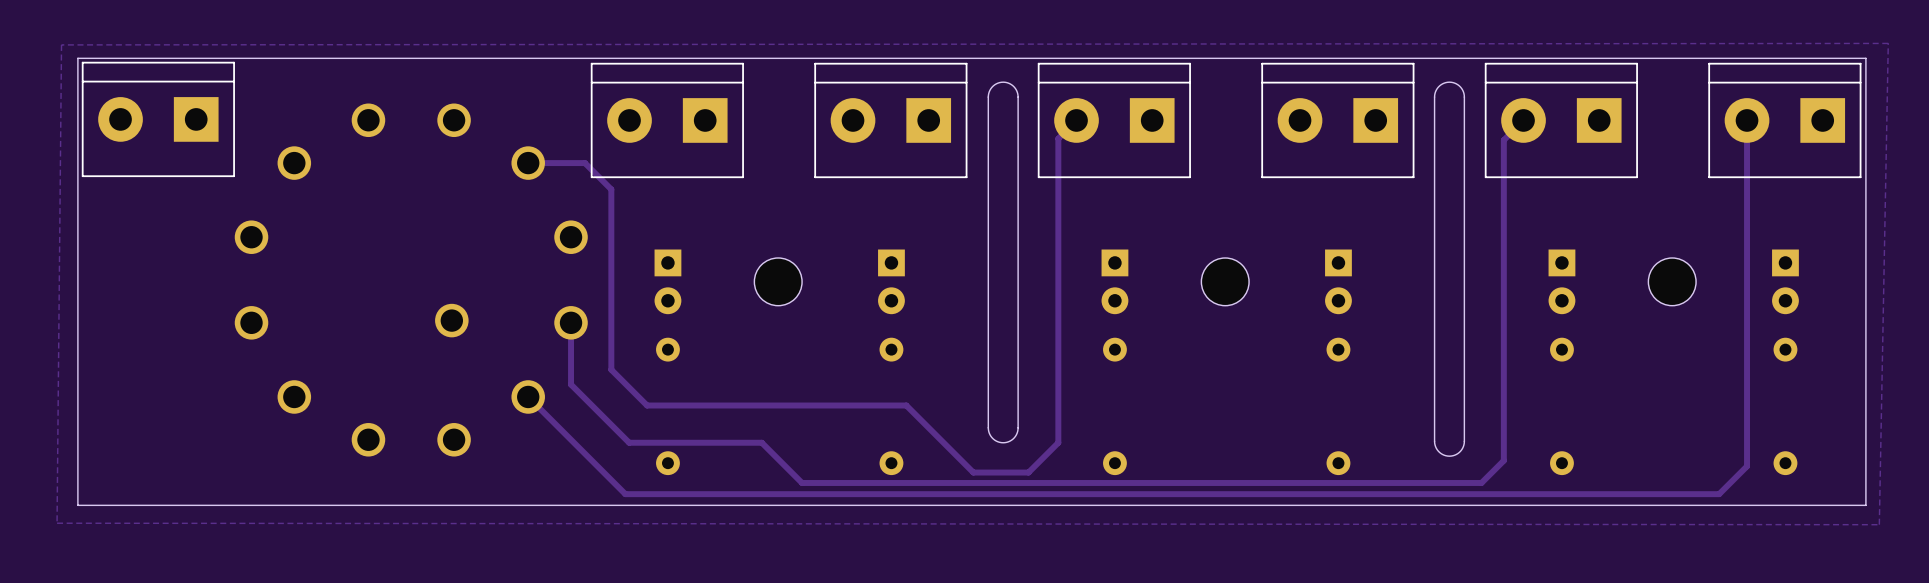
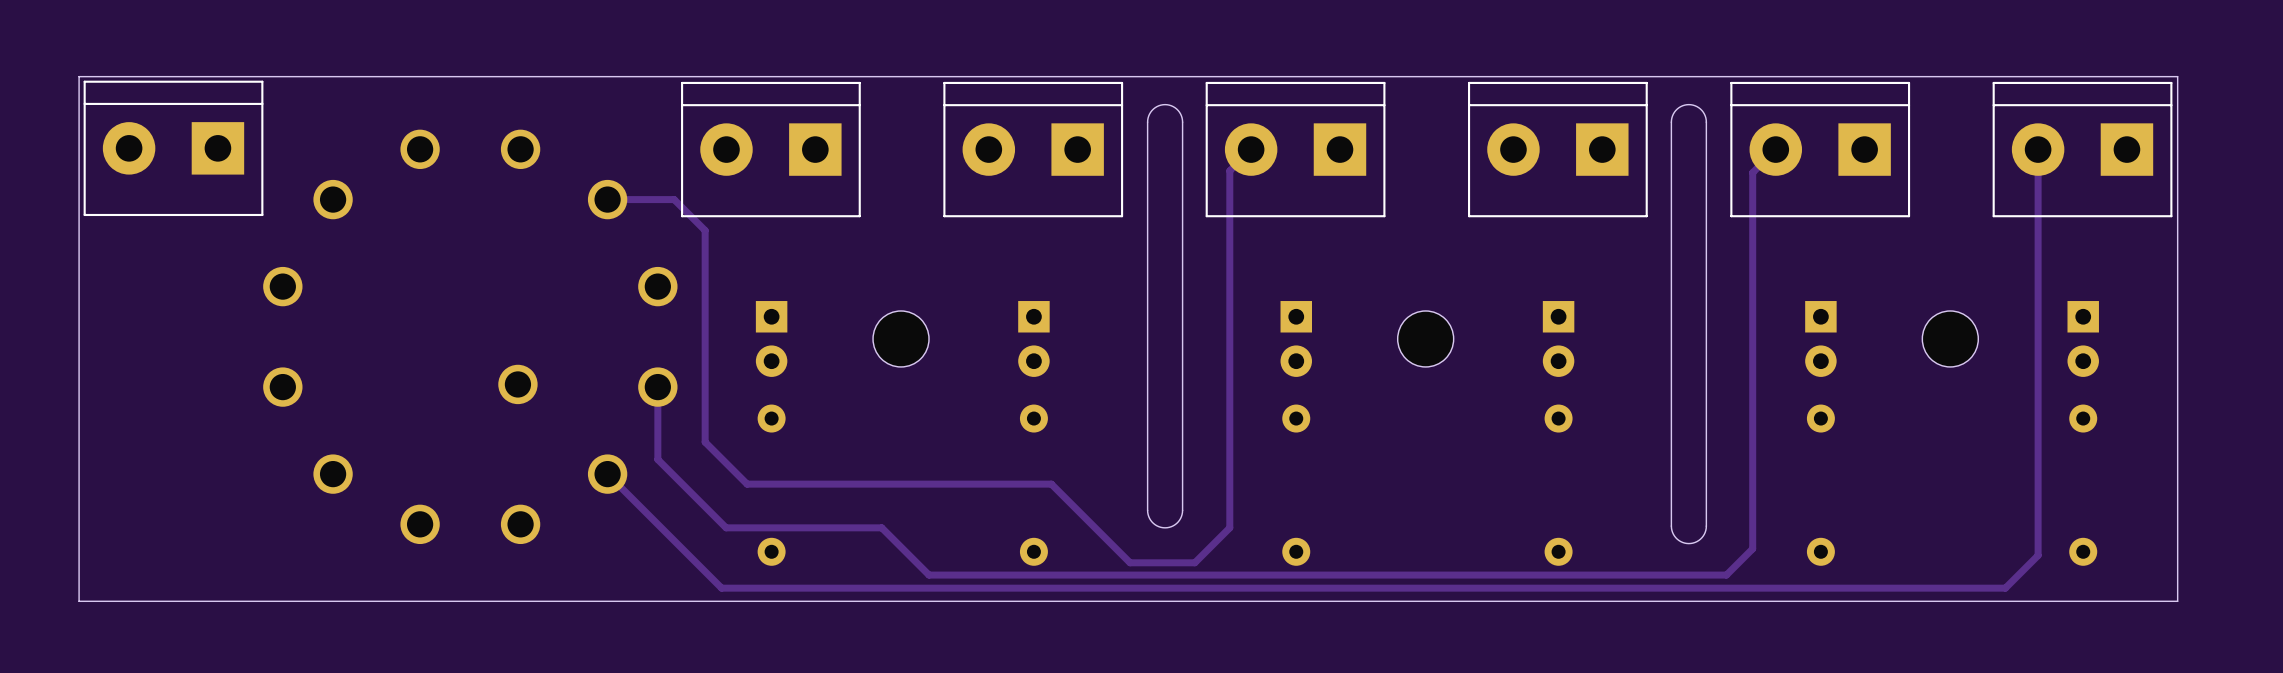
zone outline: (1888, 43) (61, 44) (57, 523) (1879, 524) (1888, 43) -> none

